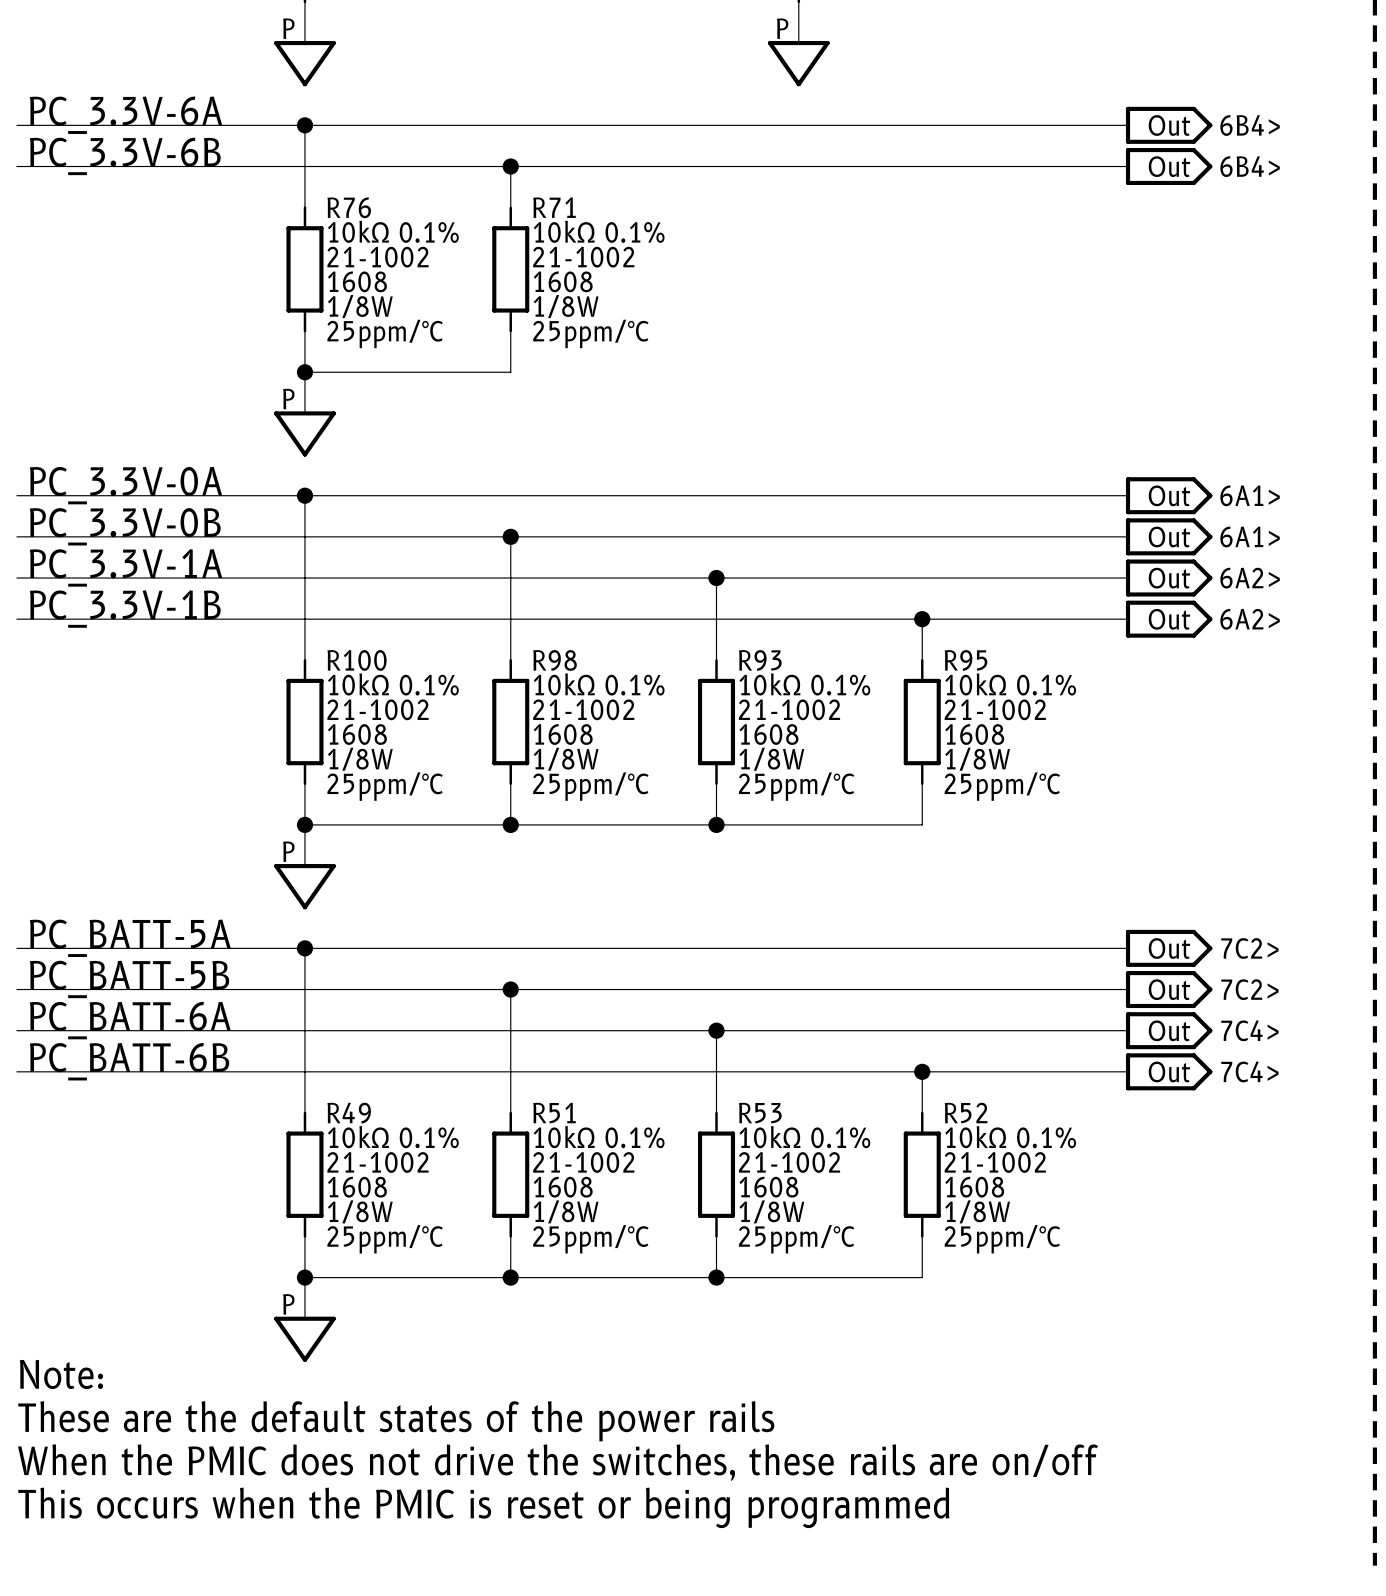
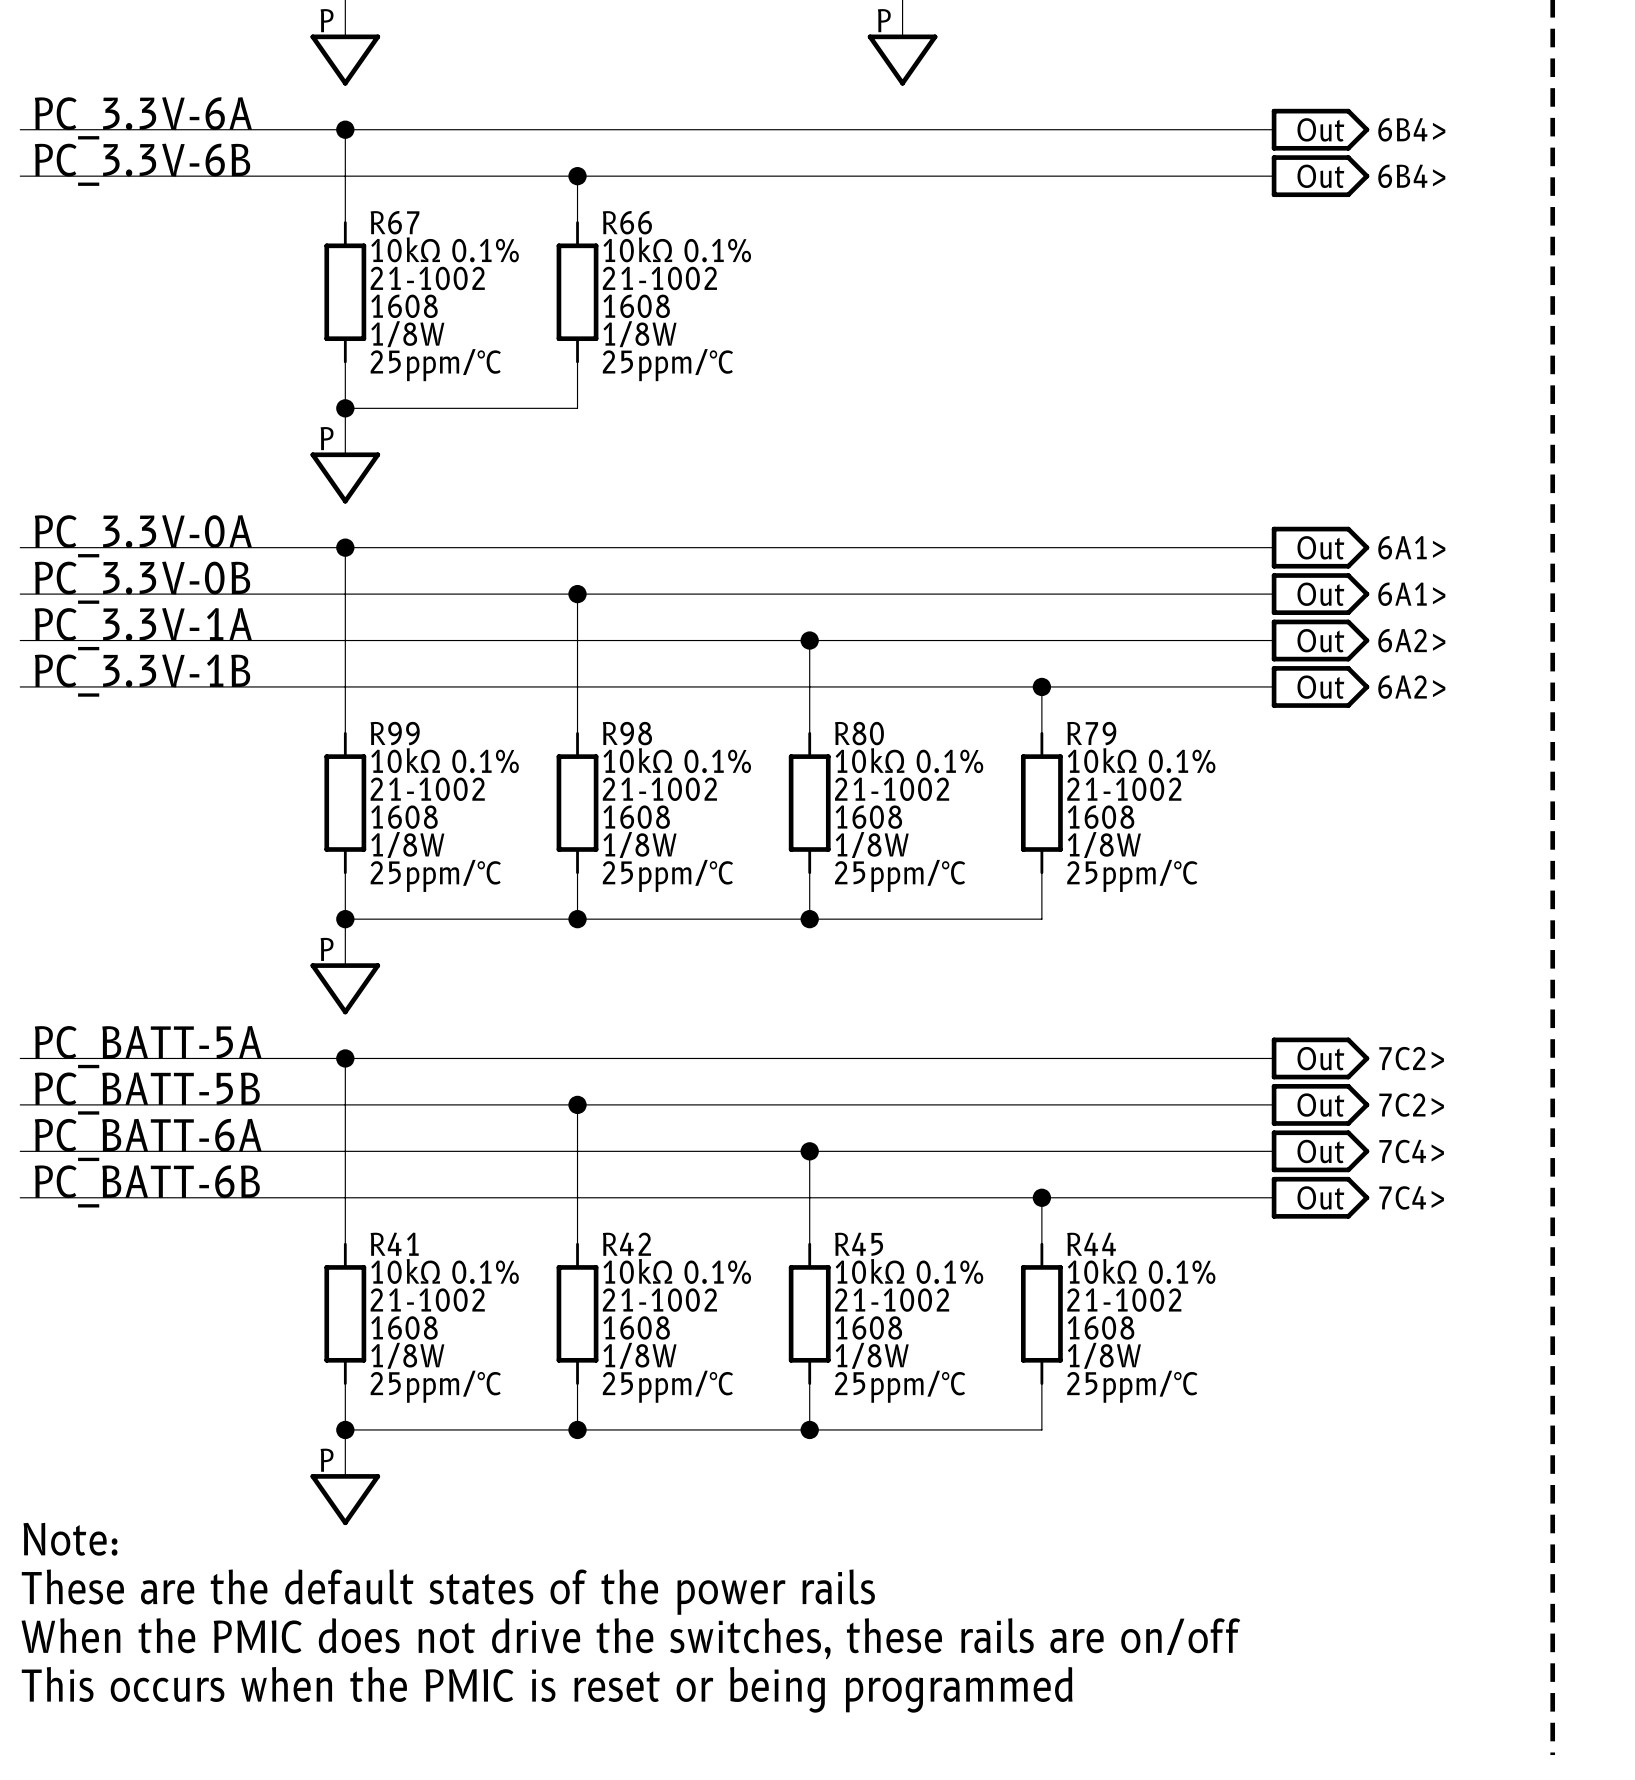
R76 name: R76 (349, 207) -> R67 (395, 222)
R71 name: R71 (554, 207) -> R66 (627, 222)
R100 name: R100 (357, 660) -> R99 (395, 733)
R93 name: R93 (760, 660) -> R80 (859, 733)
R95 name: R95 (966, 660) -> R79 (1091, 733)
R51 name: R51 (554, 1112) -> R42 (626, 1244)
R49 name: R49 (349, 1113) -> R41 (394, 1244)
R53 name: R53 (760, 1113) -> R45 (859, 1244)
R52 name: R52 (966, 1113) -> R44 (1091, 1244)

